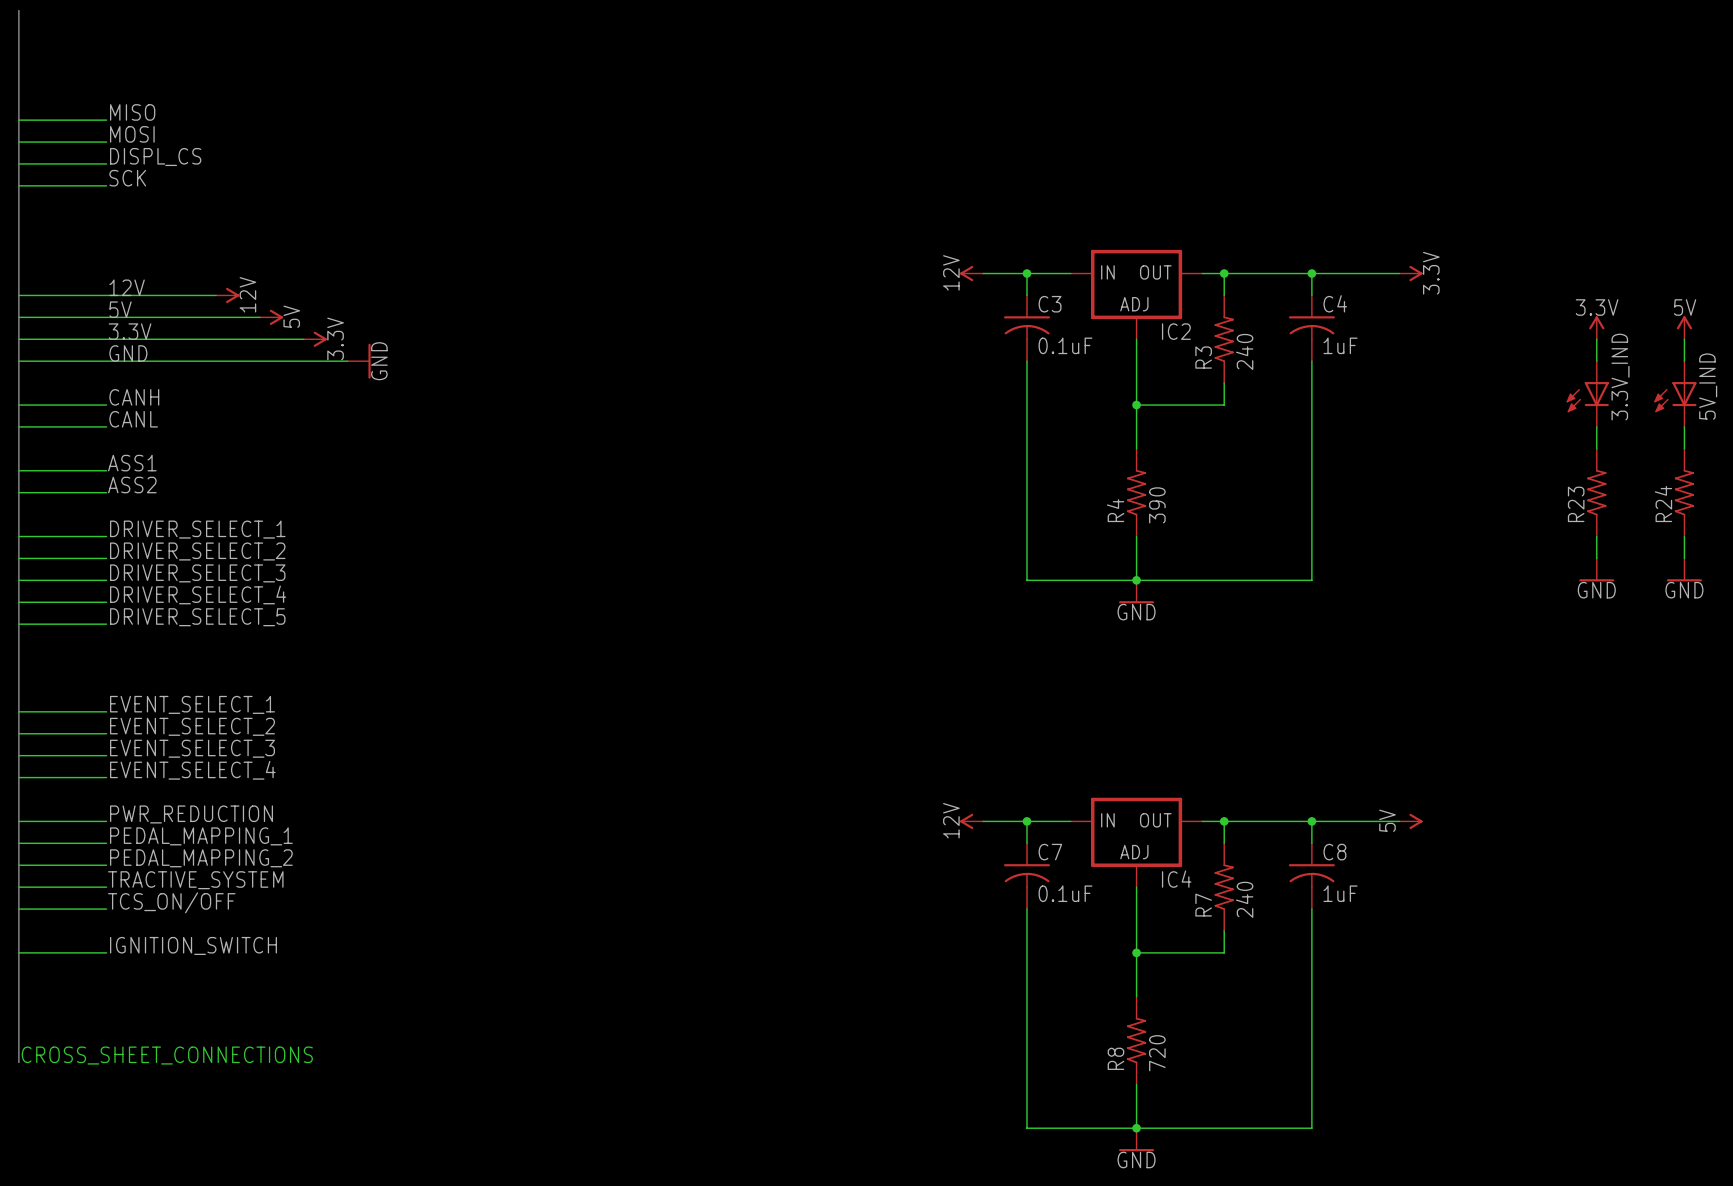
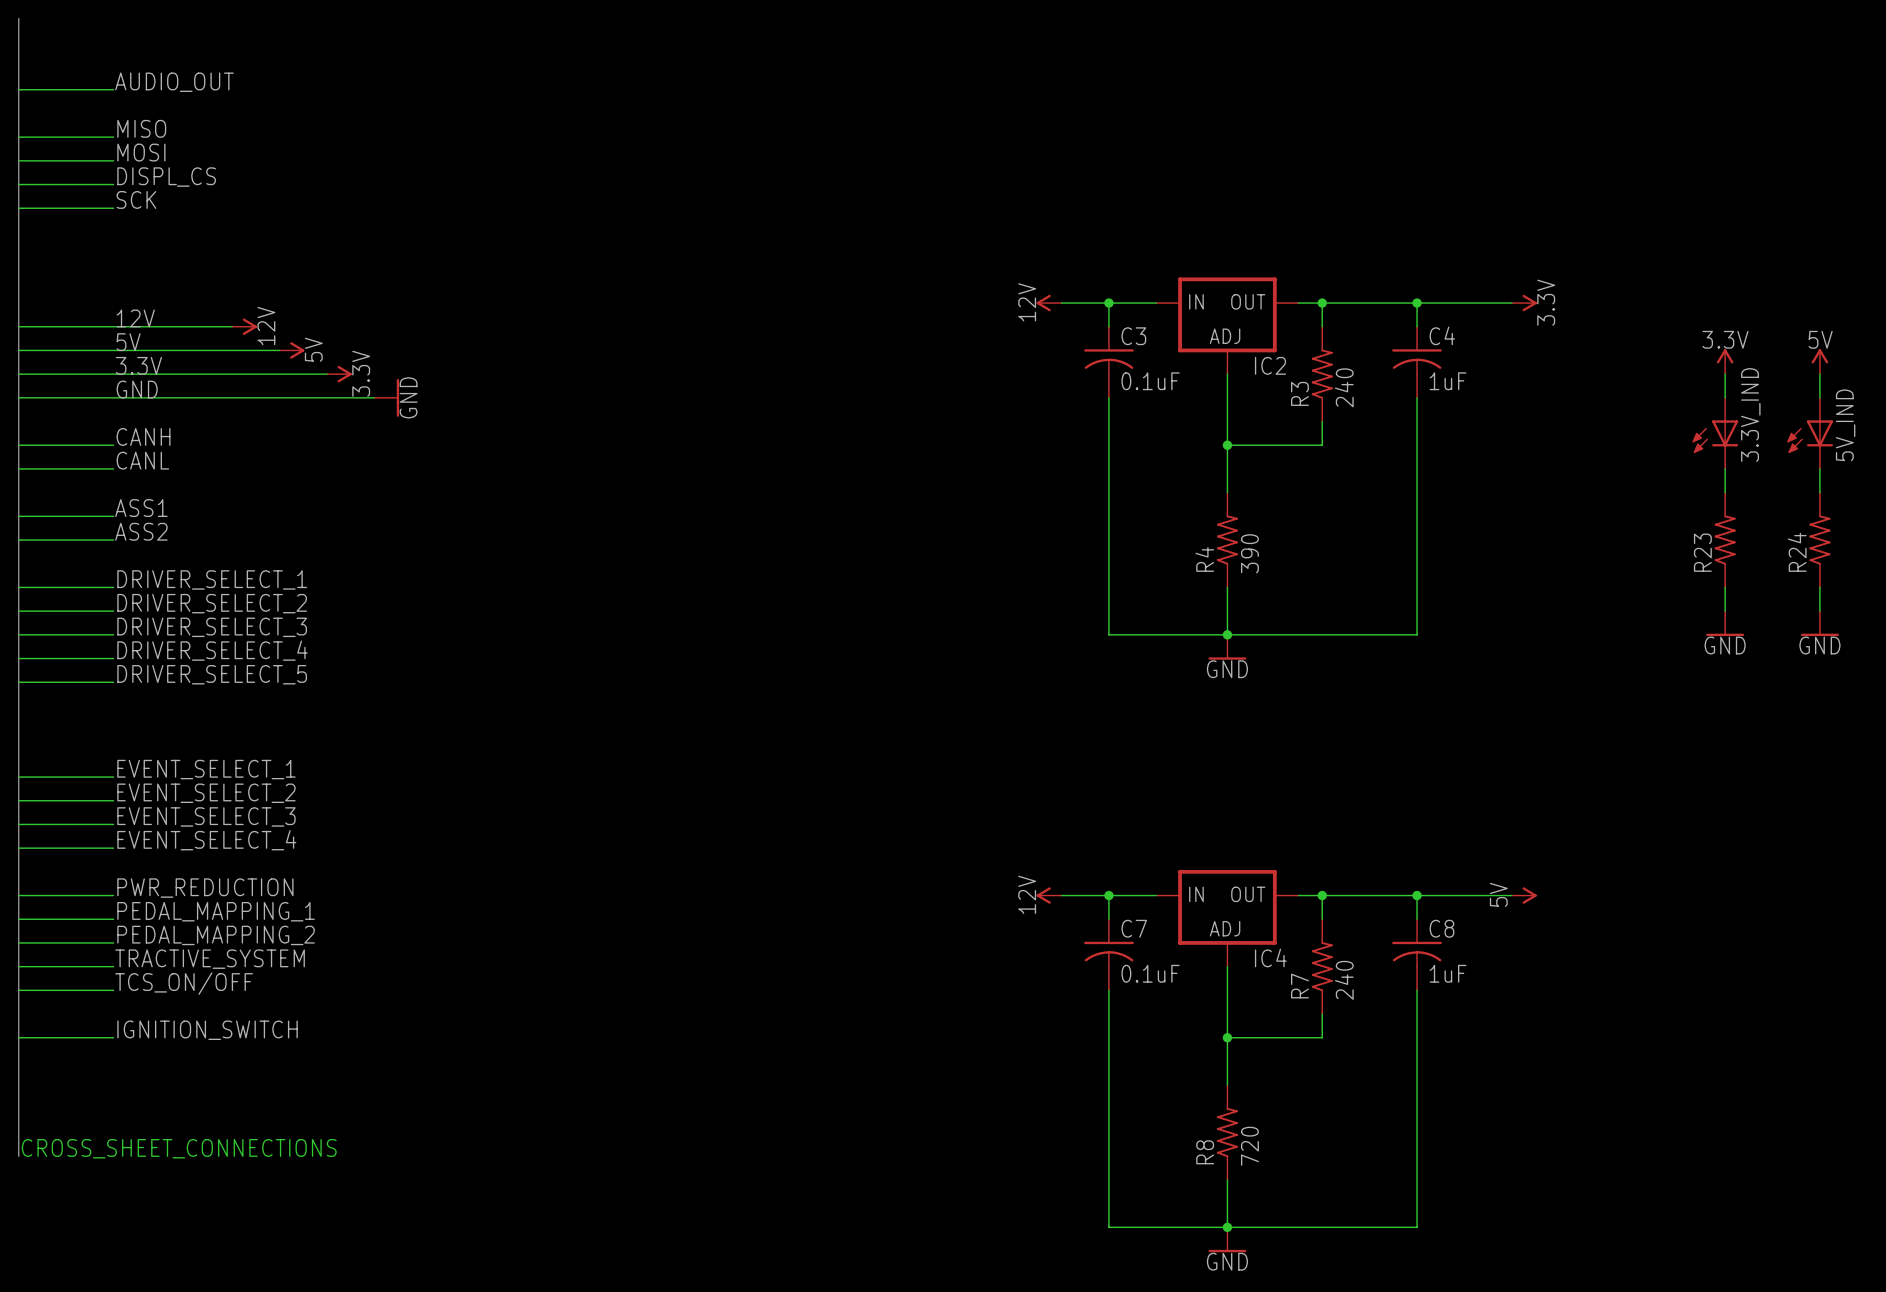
label: none -> AUDIO_OUT (174, 82)
wire: none -> (18, 89) (113, 89)

